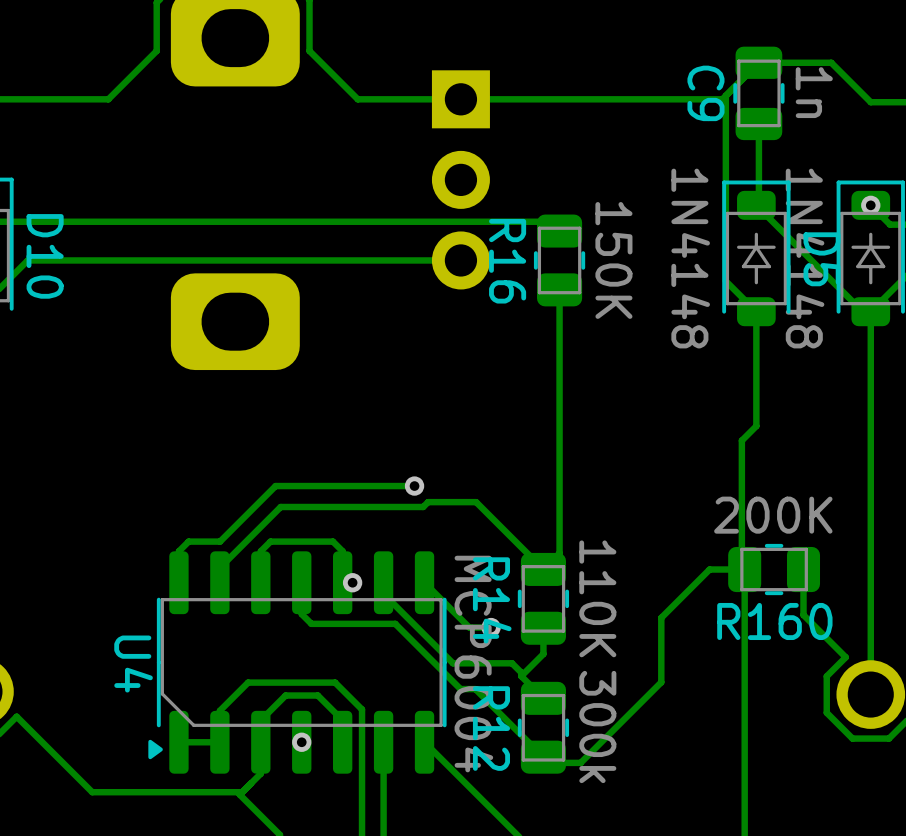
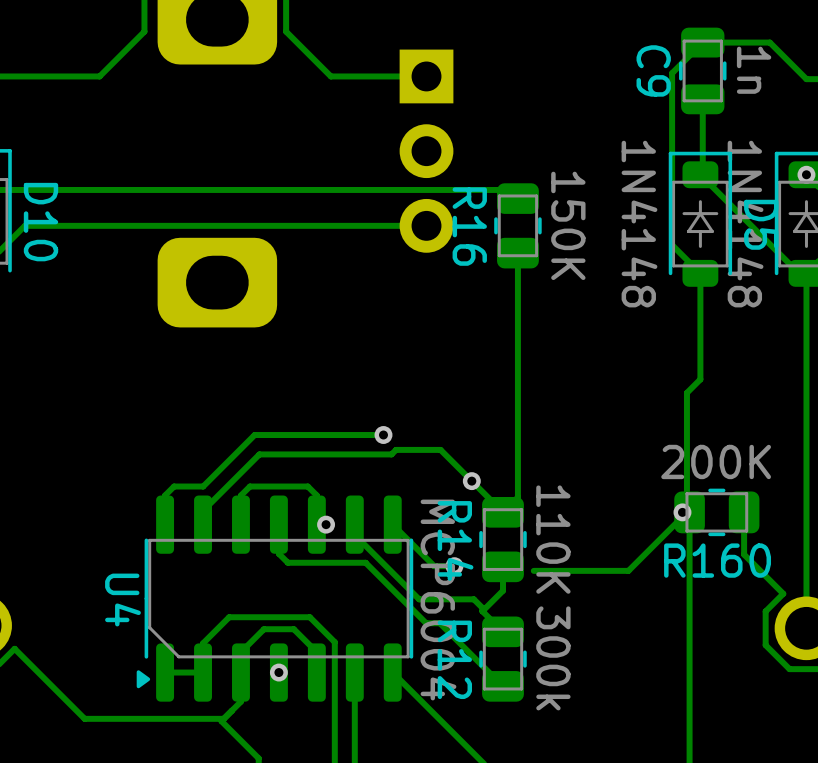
track: (725, 95) (722, 99) (460, 99) -> none
via: none -> (471, 481)
track: none -> (686, 507) (682, 512) (682, 516) (628, 570) (533, 570)
via: none -> (682, 512)
track: (744, 569) (709, 569) (661, 617) (661, 682) (580, 762) (549, 762) -> none

